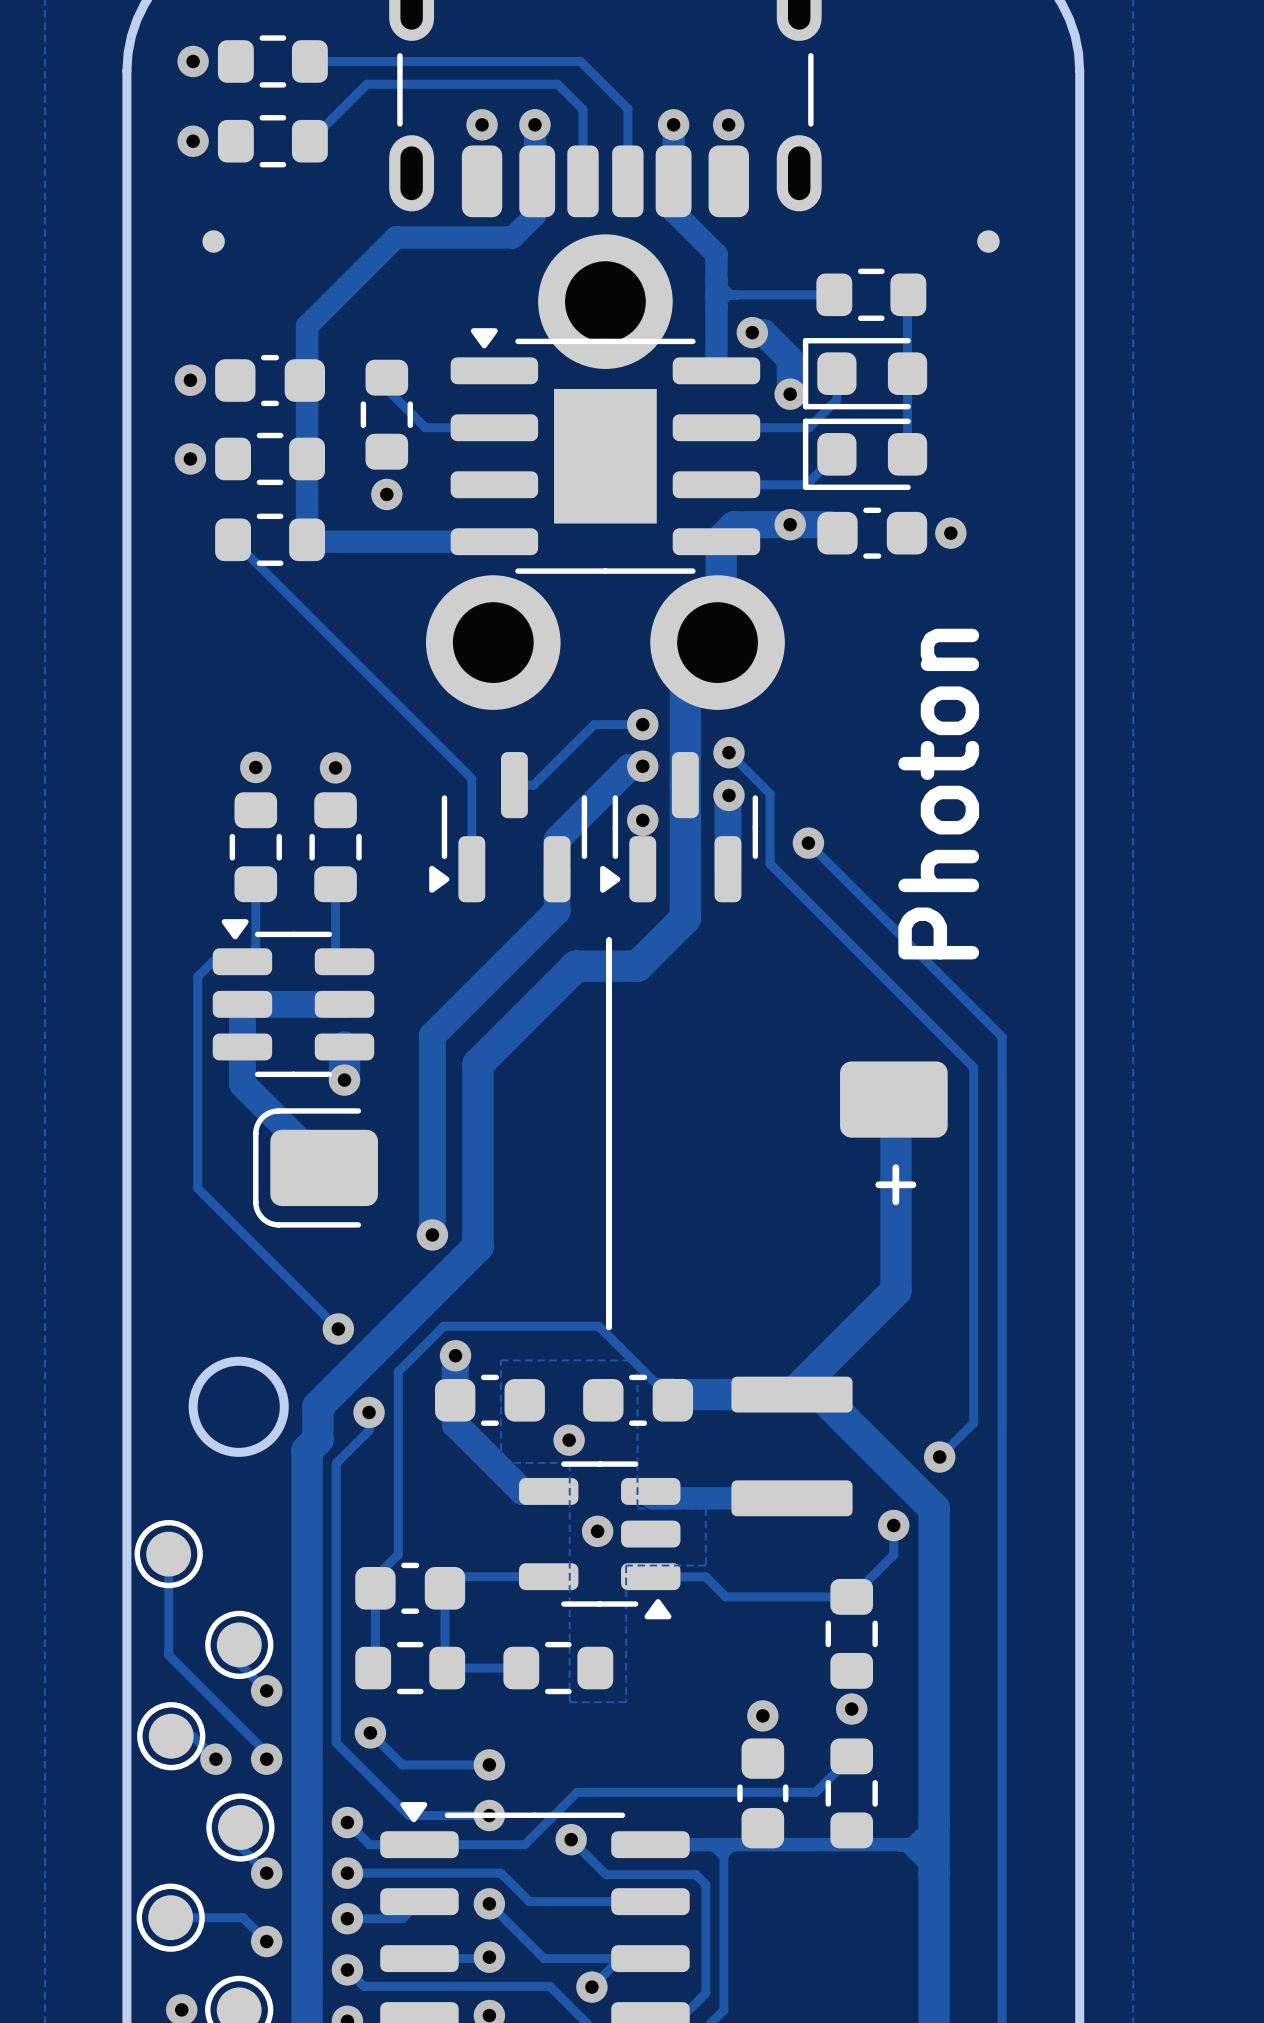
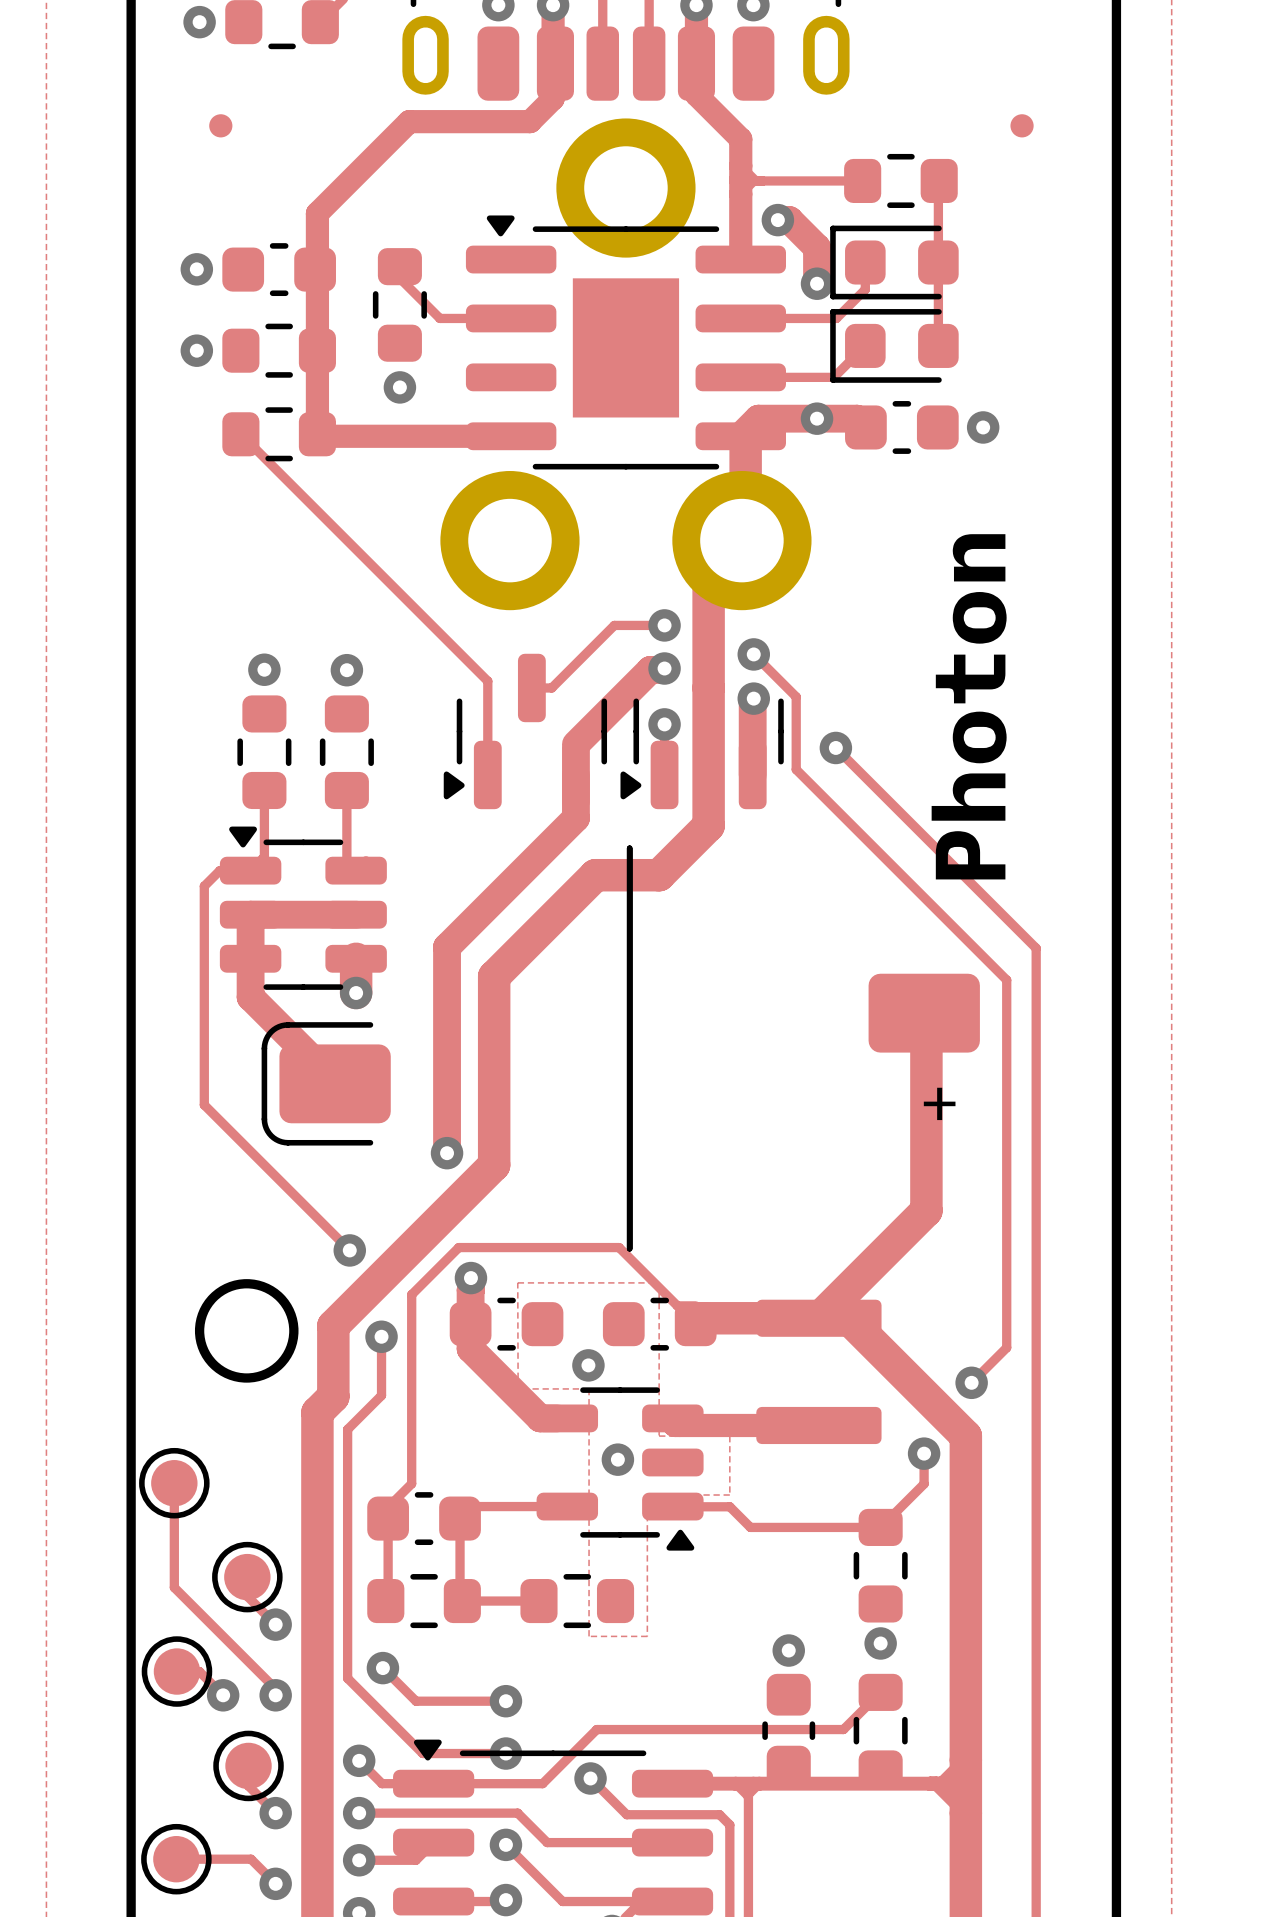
track: (322, 1402) (317, 1406) (317, 1439) (307, 1450) (307, 1485) -> (333, 1325) (333, 1396) (317, 1412)
track: (369, 1430) (336, 1463) (336, 1502) -> (381, 1355) (381, 1395) (347, 1429)

